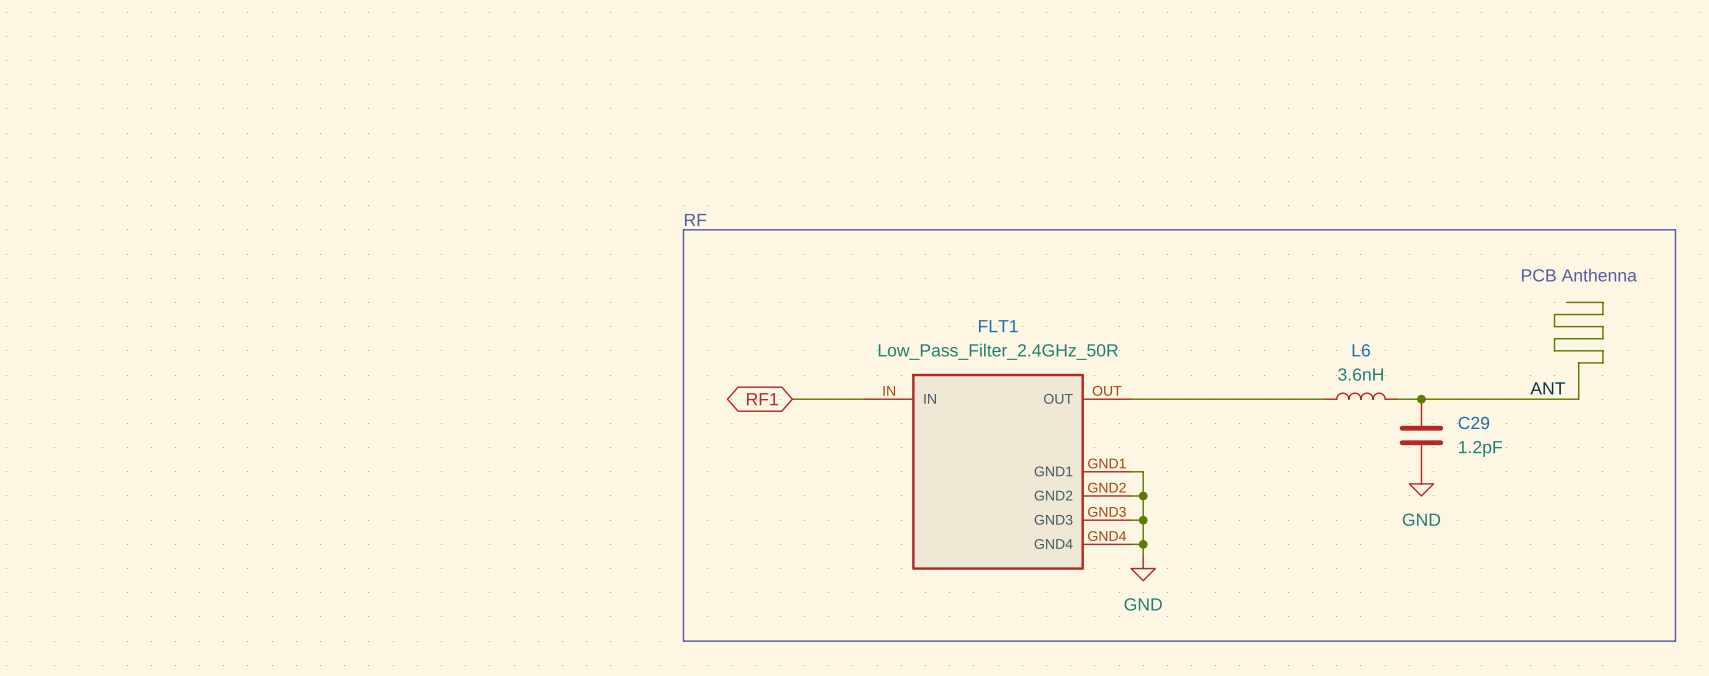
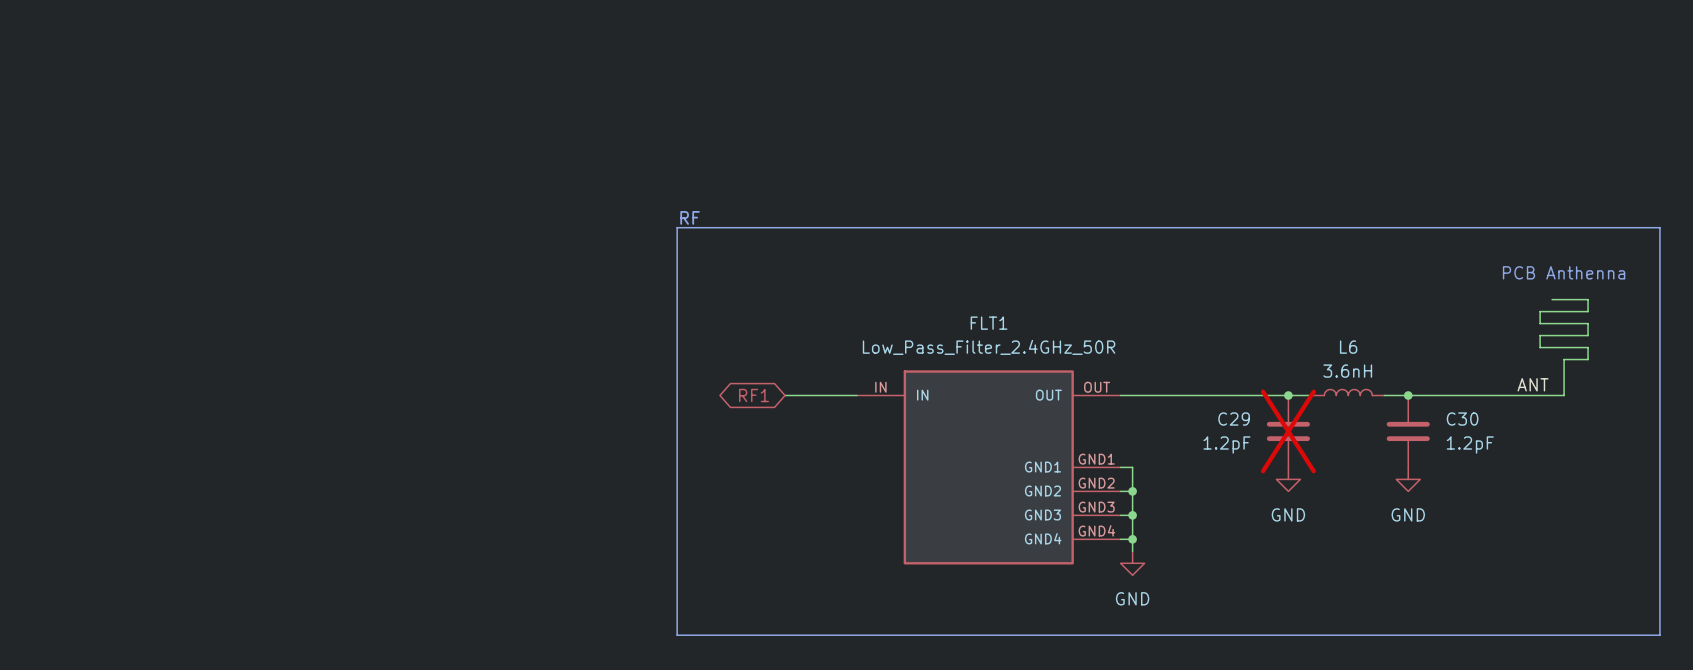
junction: none -> (1288, 395)
C29 name: C29 (1473, 422) -> C30 (1462, 419)
C29: none -> 1.2pF (1288, 431)
power symbol: none -> GND (1288, 479)

